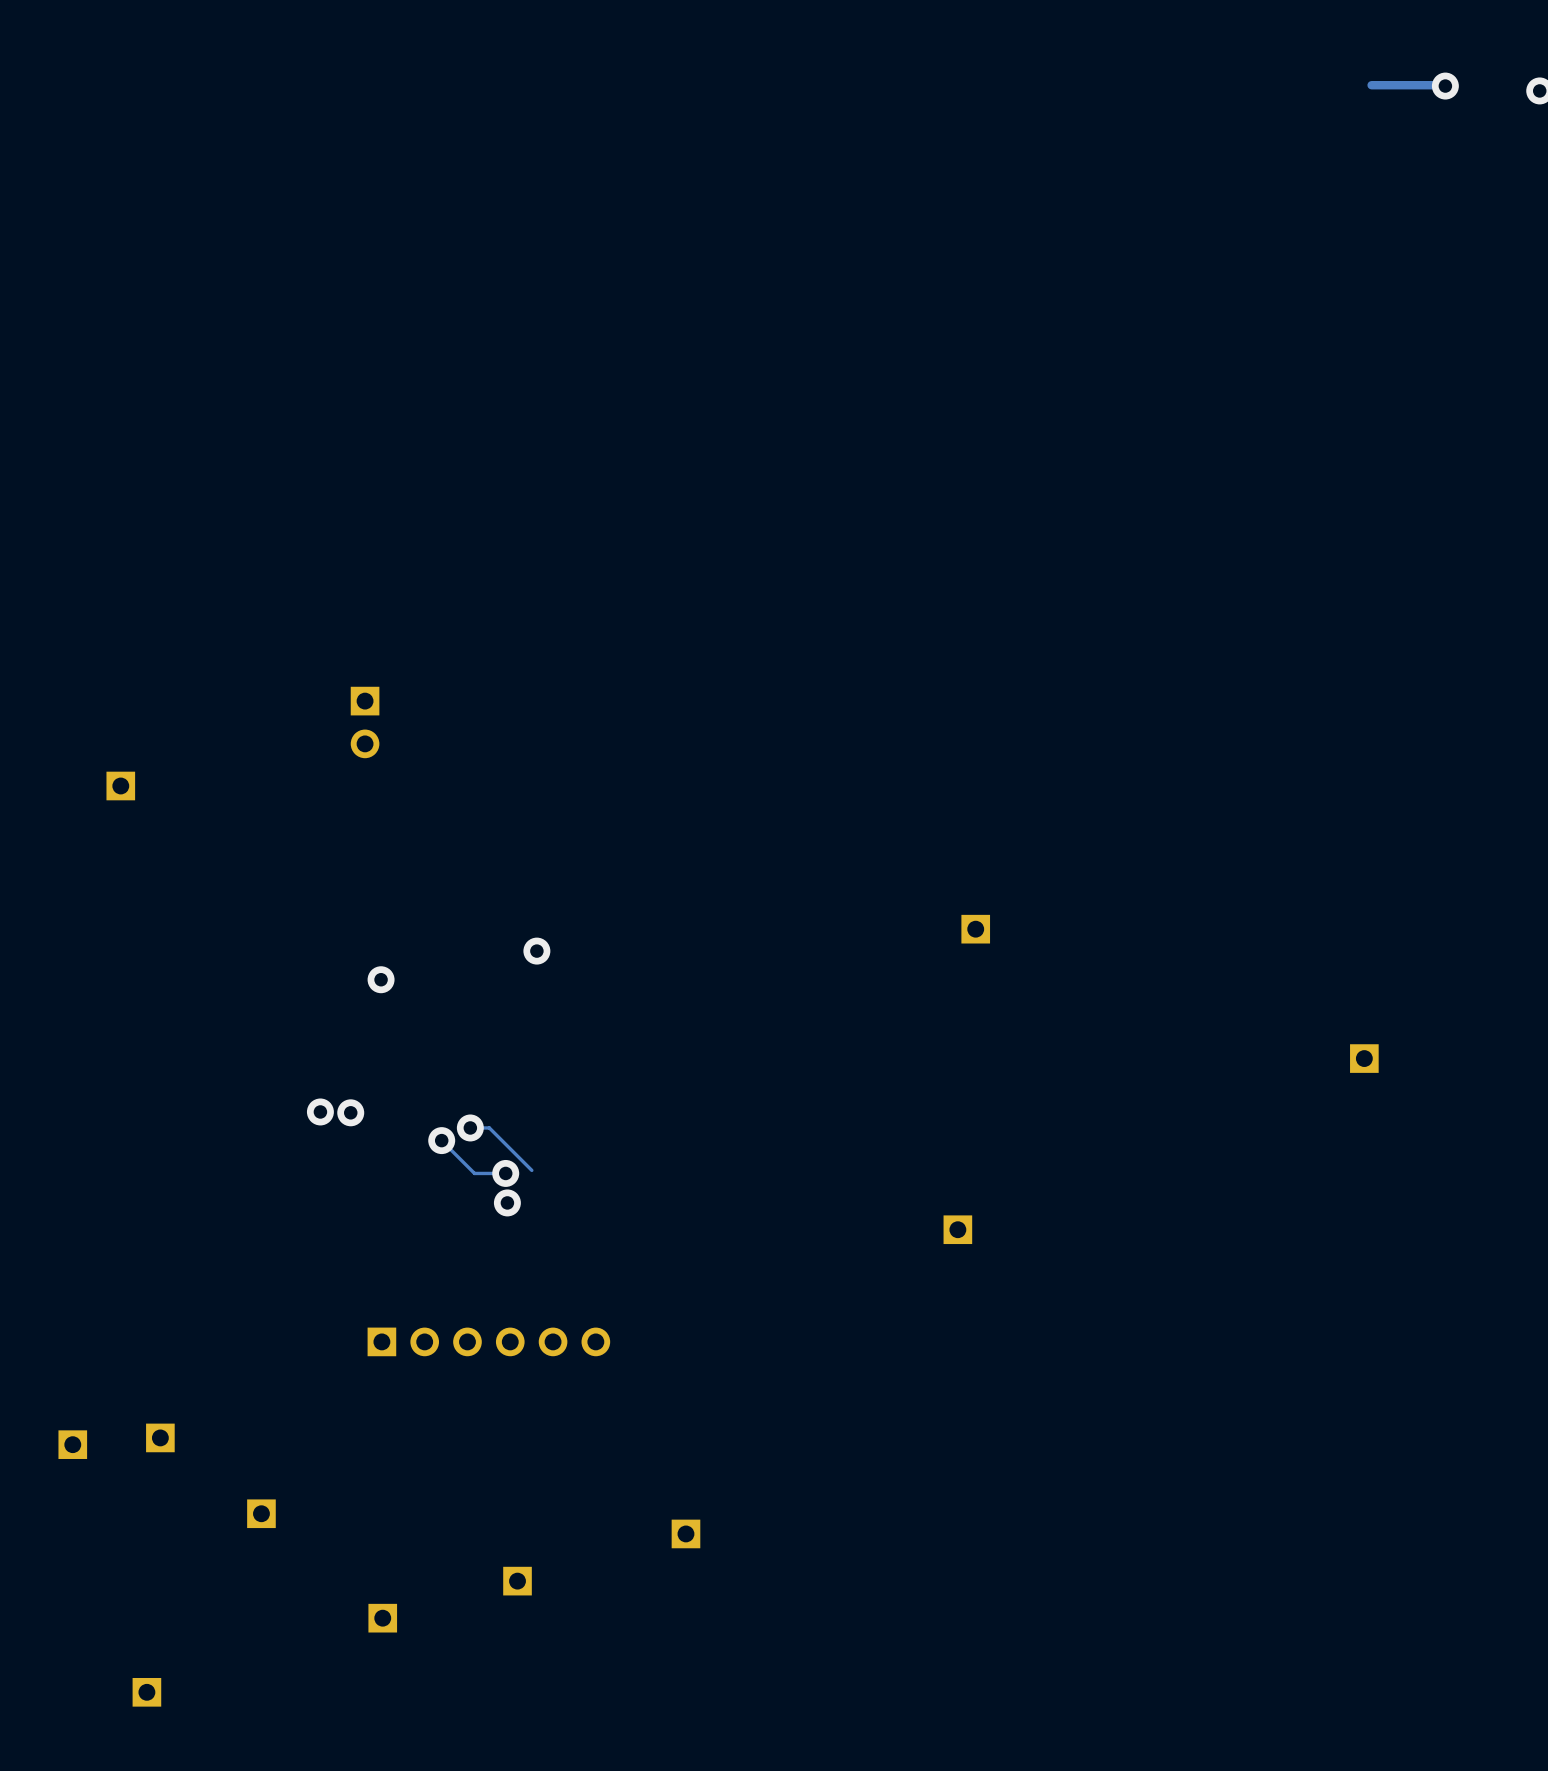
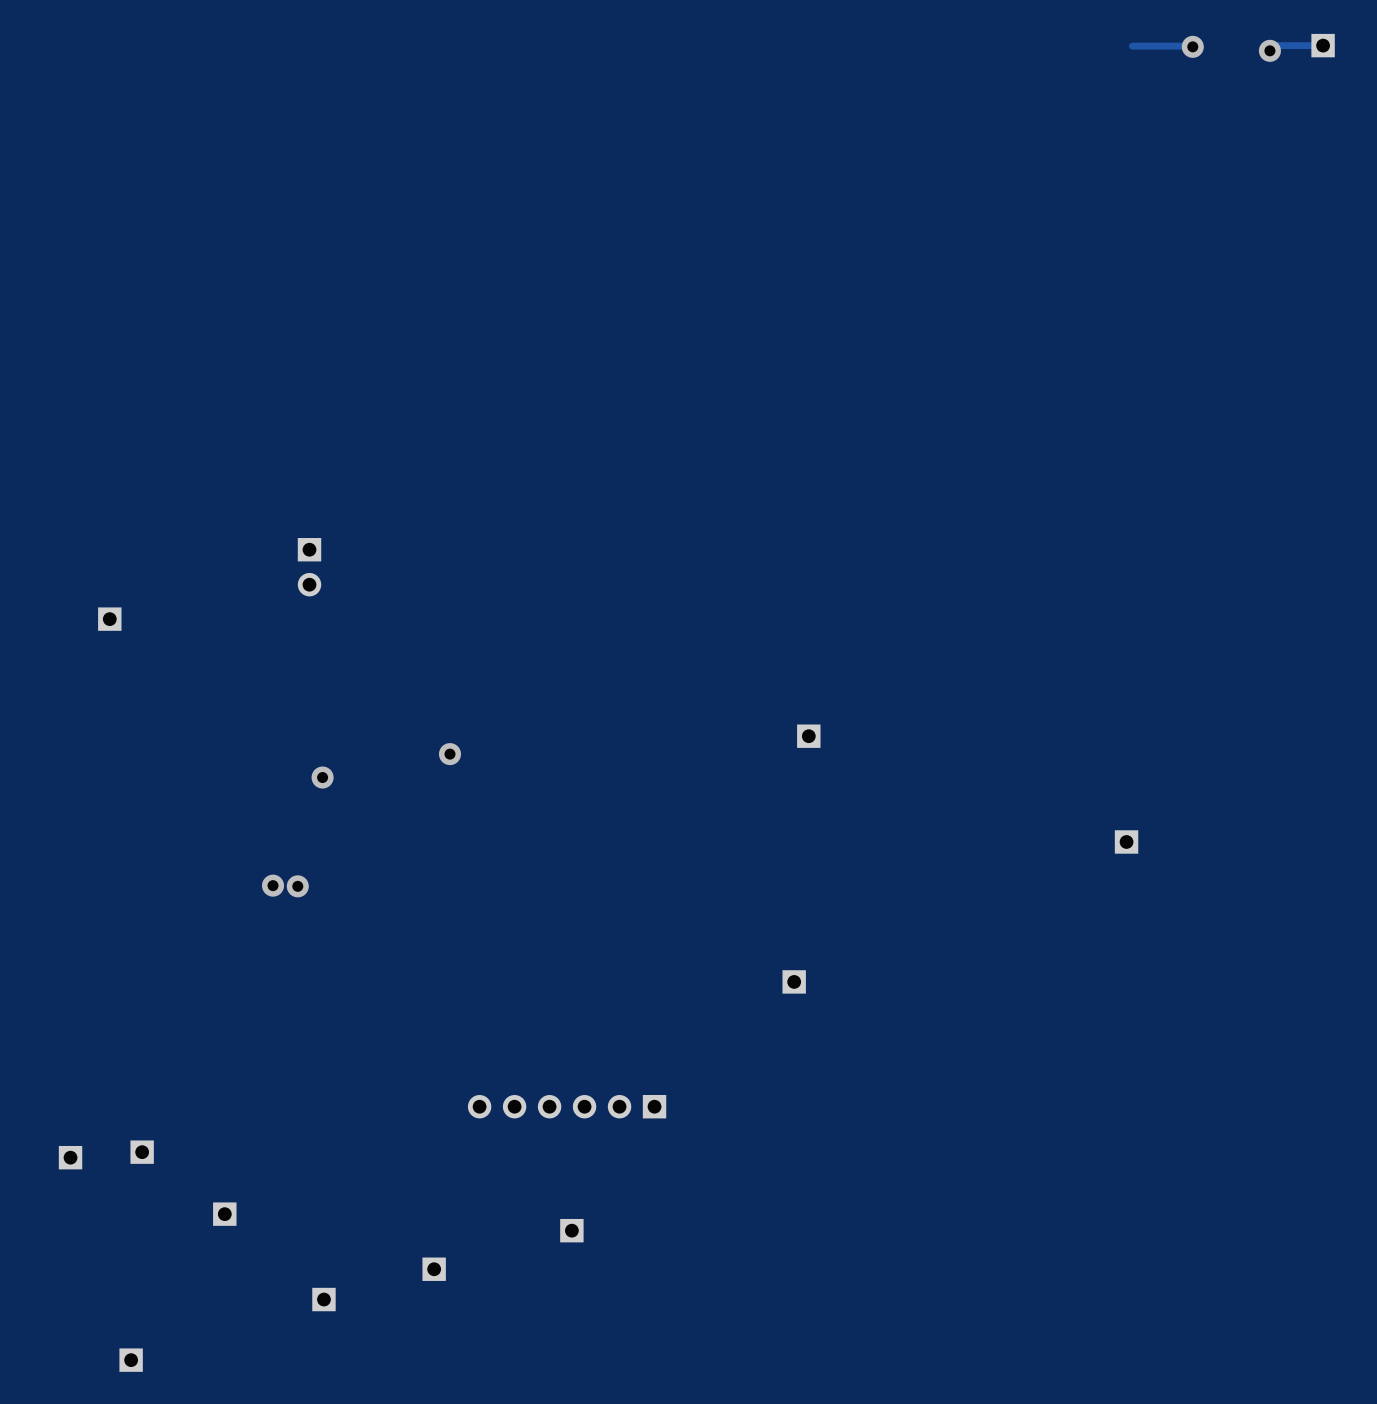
track: (470, 1127) (489, 1127) (531, 1170) -> none
via: (470, 1127) -> none
track: (441, 1140) (474, 1173) (505, 1173) -> none
via: (441, 1140) -> none
via: (505, 1173) -> none
via: (507, 1202) -> none
part rotation: 0° (488, 1341) -> 180° (567, 1106)
part position: (488, 1341) -> (567, 1106)

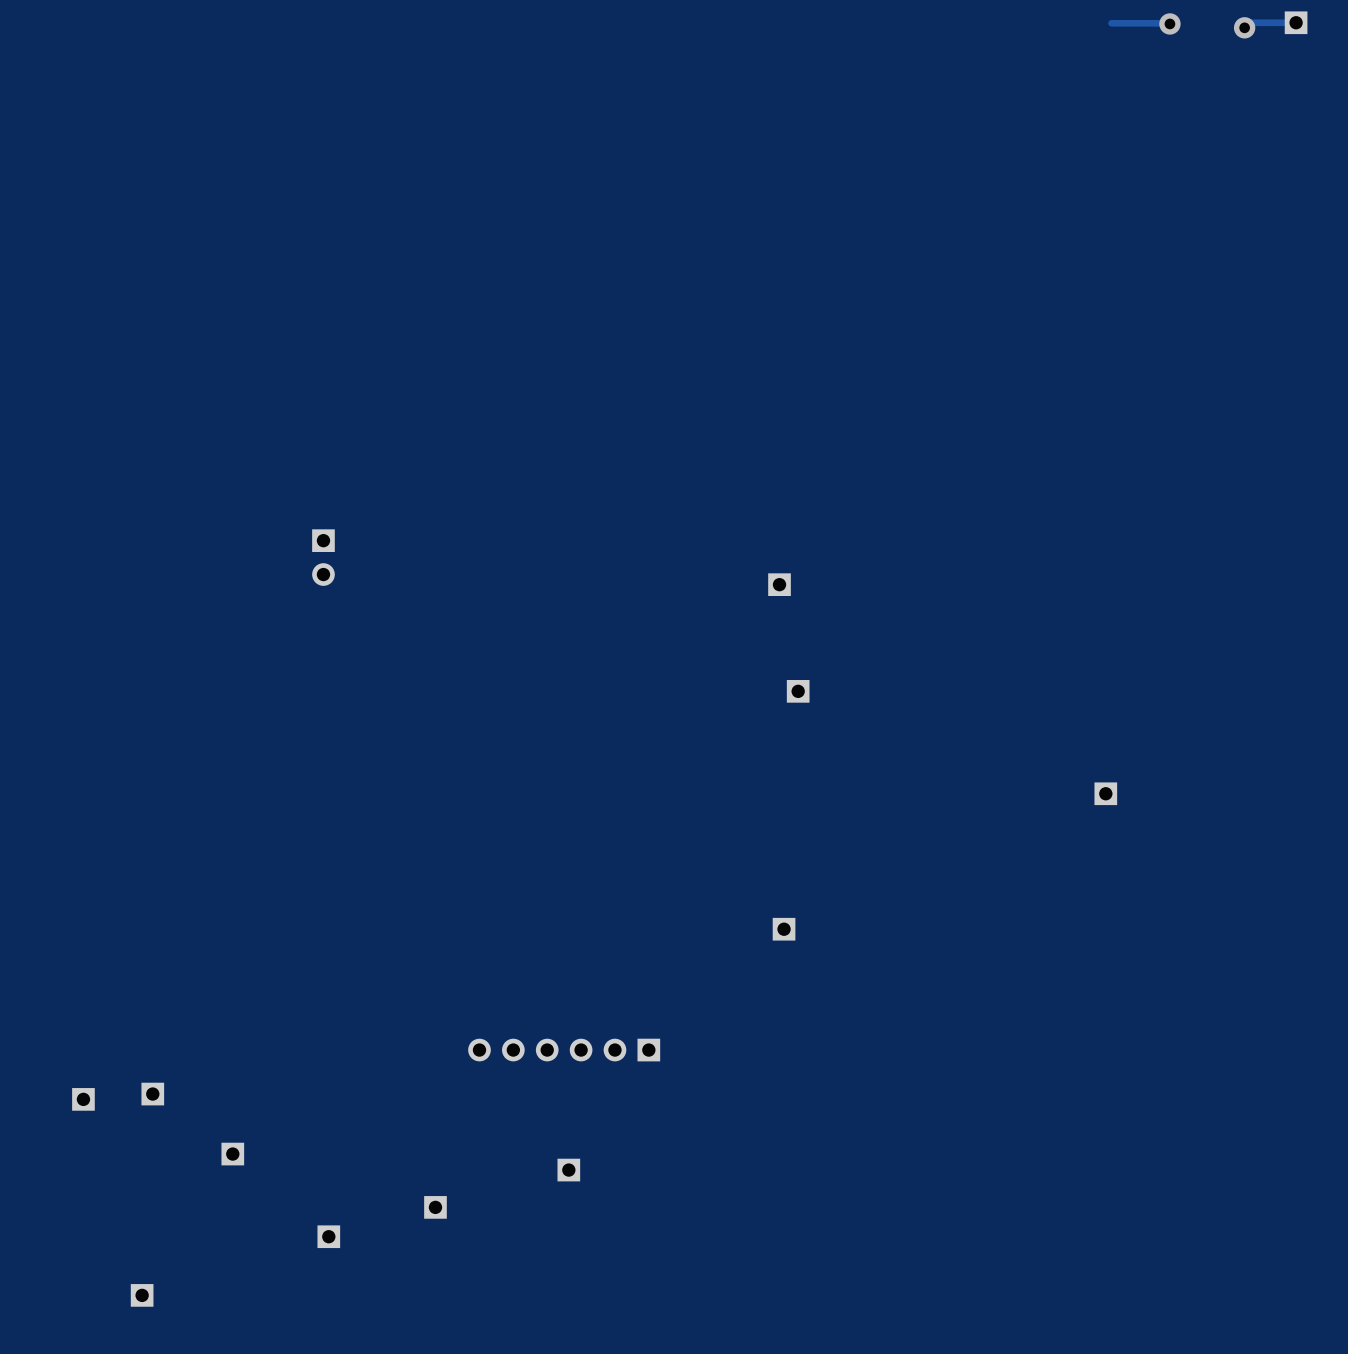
part position: (309, 567) -> (323, 557)
part: (109, 619) -> none
part: none -> (779, 584)
via: (449, 754) -> none
via: (322, 777) -> none
via: (273, 885) -> none
via: (297, 886) -> none

